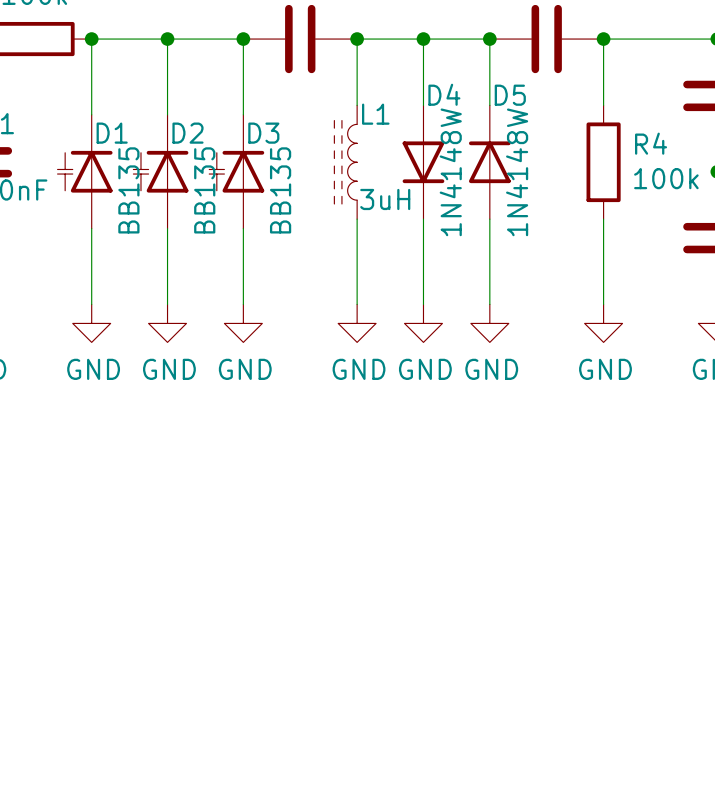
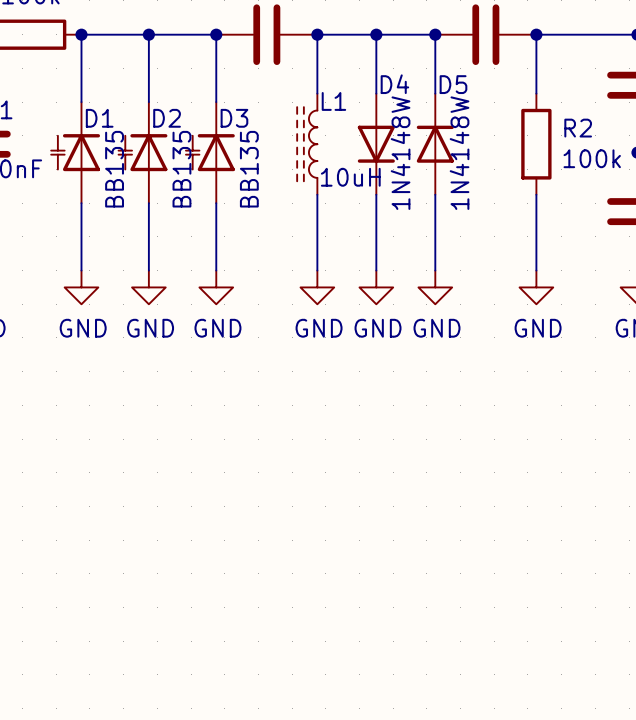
R4 name: R4 (651, 143) -> R2 (578, 128)
L1 value: 3uH (385, 199) -> 10uH (350, 177)

